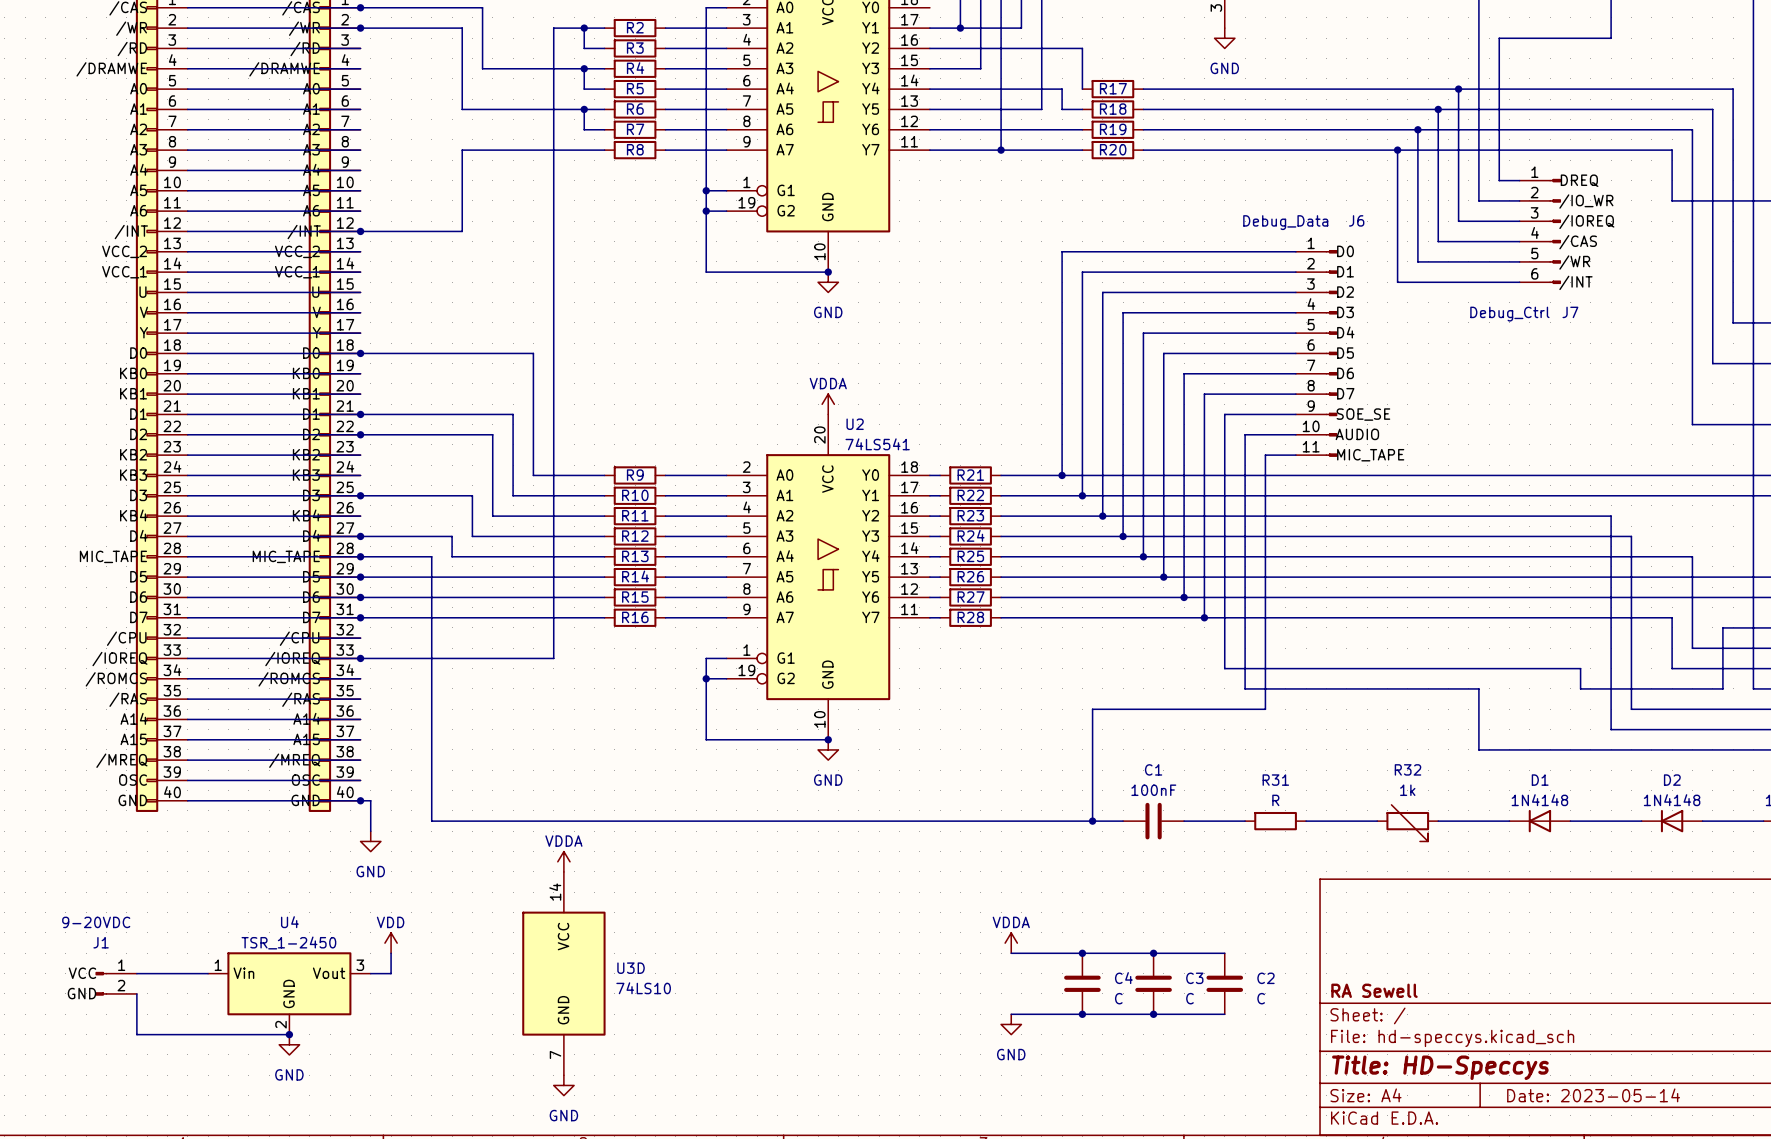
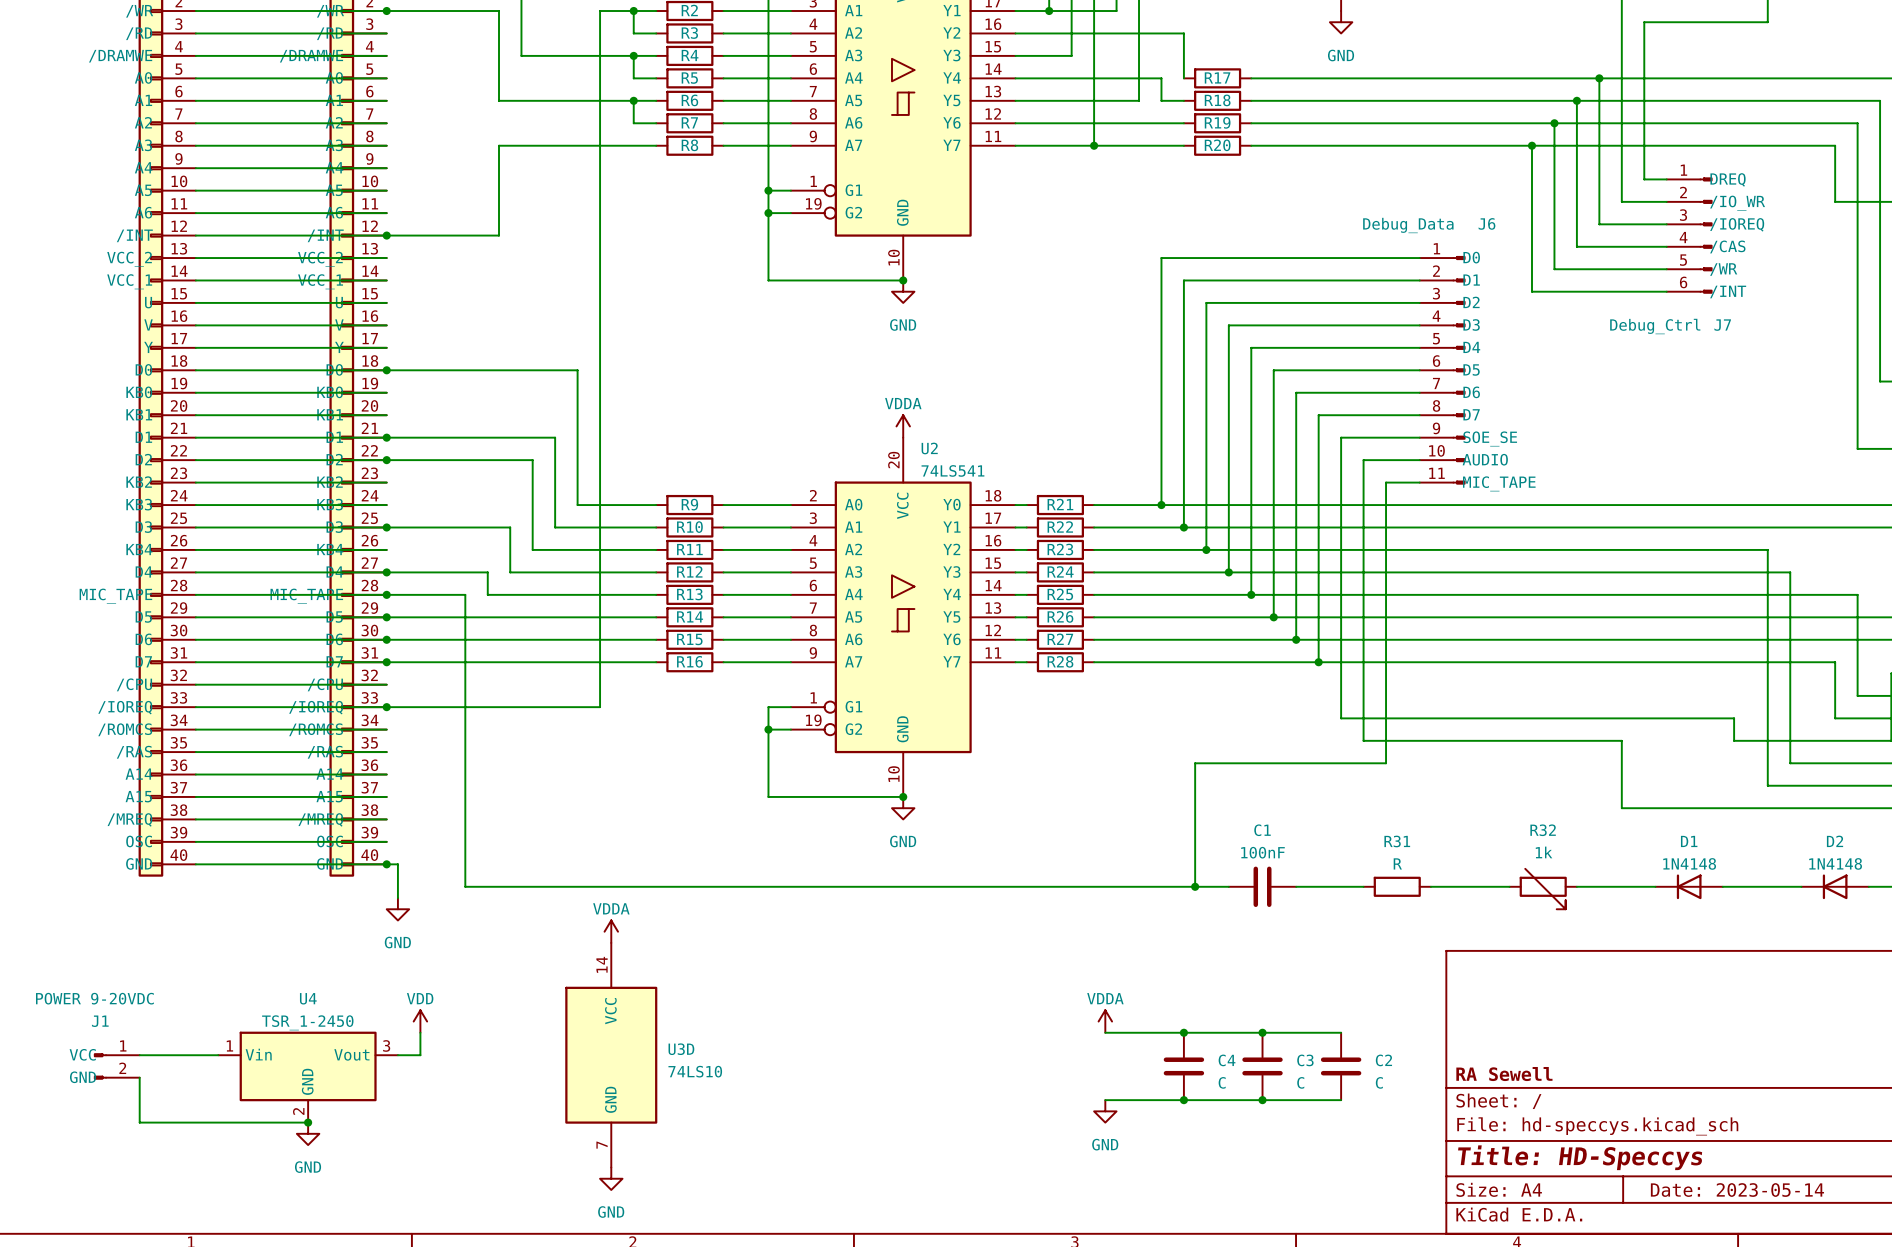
J1 value: 9-20VDC (96, 922) -> POWER 9-20VDC (94, 998)

